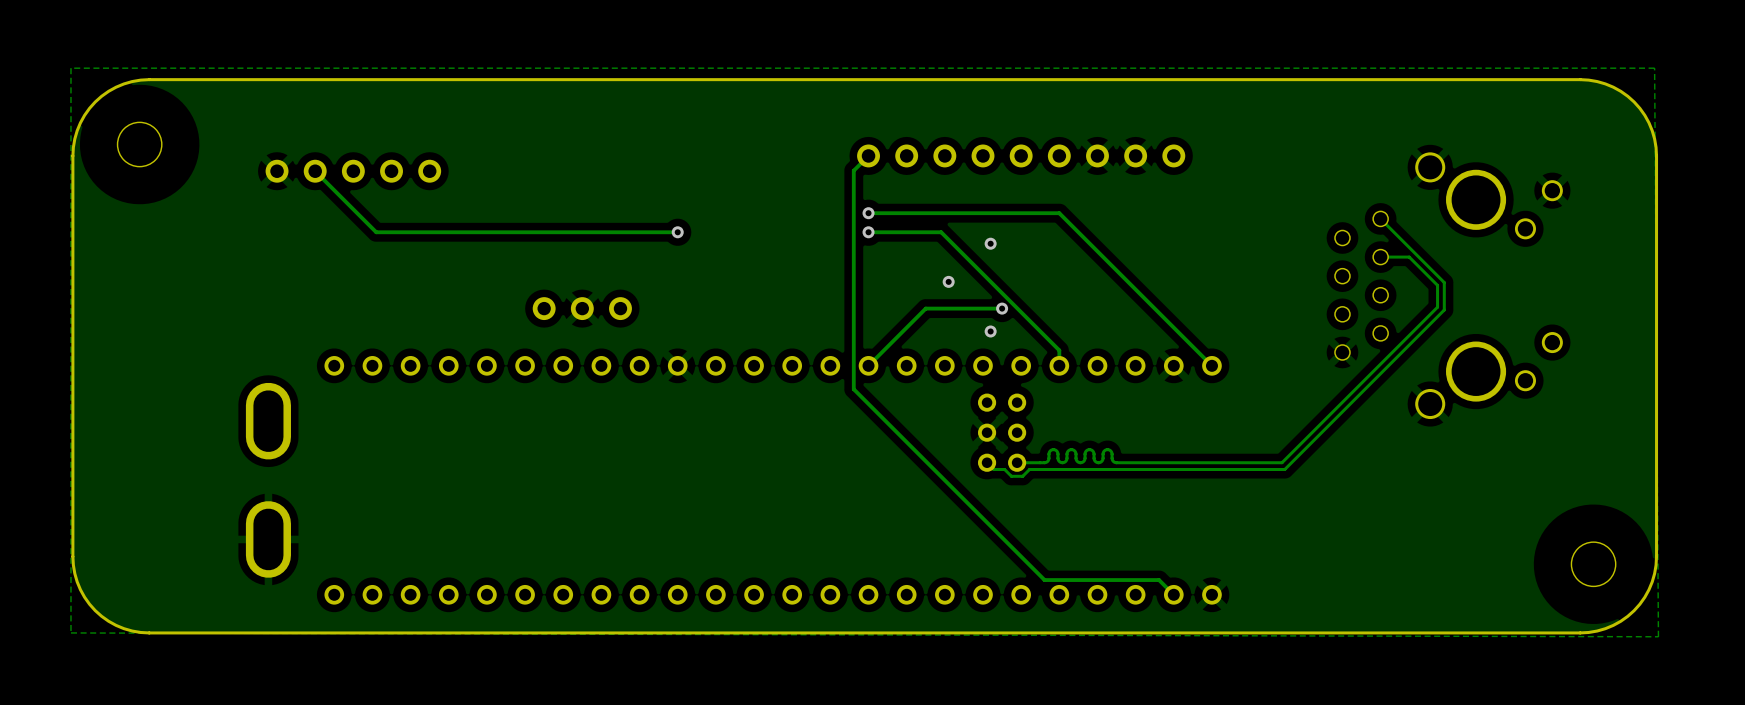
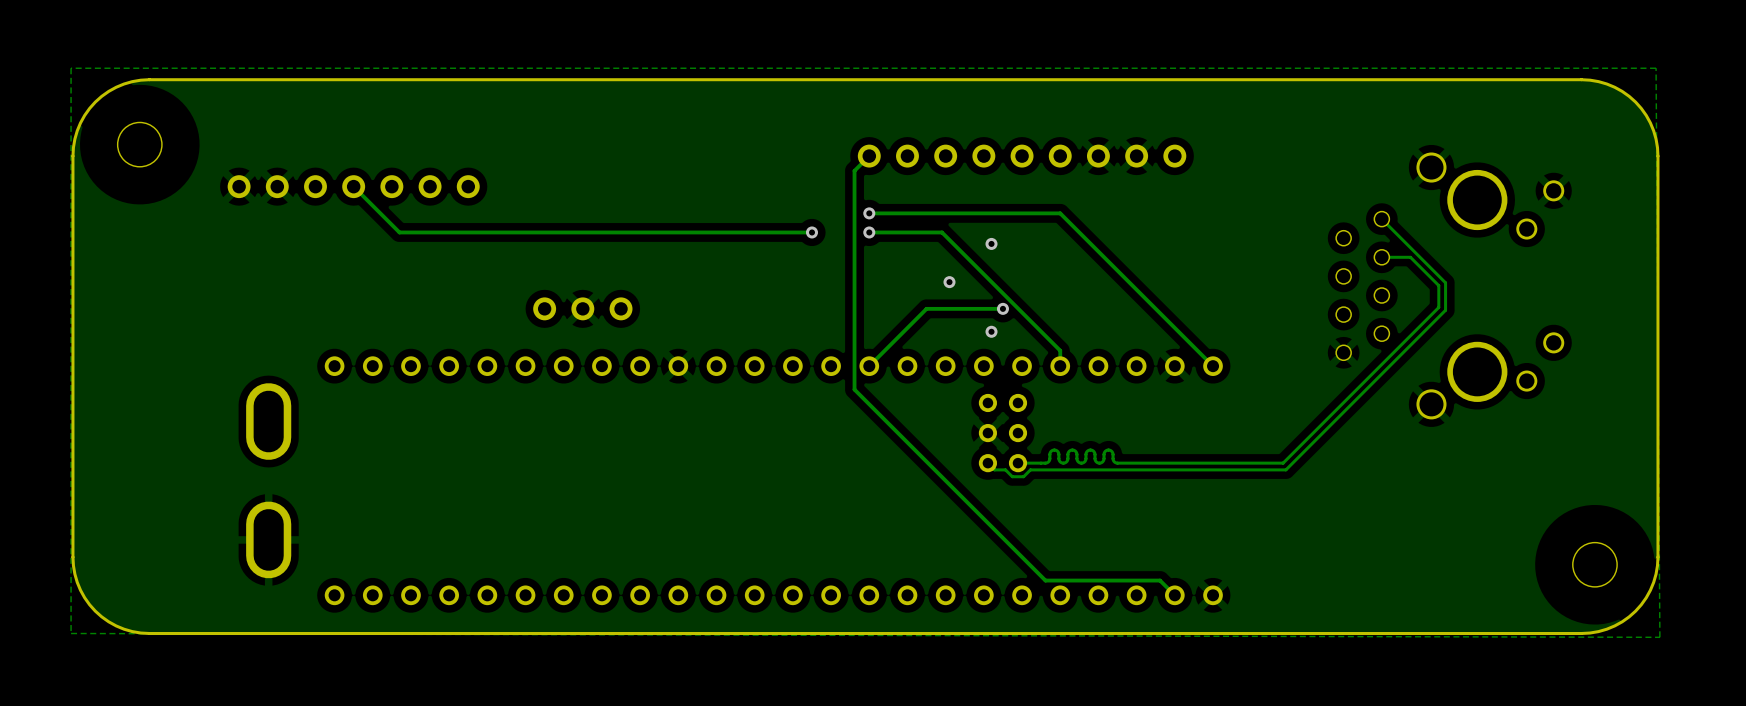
track: (315, 171) (376, 232) (399, 232) -> (353, 186) (399, 232)
part: (353, 171) -> none
part: none -> (353, 186)
via: (677, 232) -> none
track: none -> (811, 232) (678, 232)
via: none -> (811, 232)

